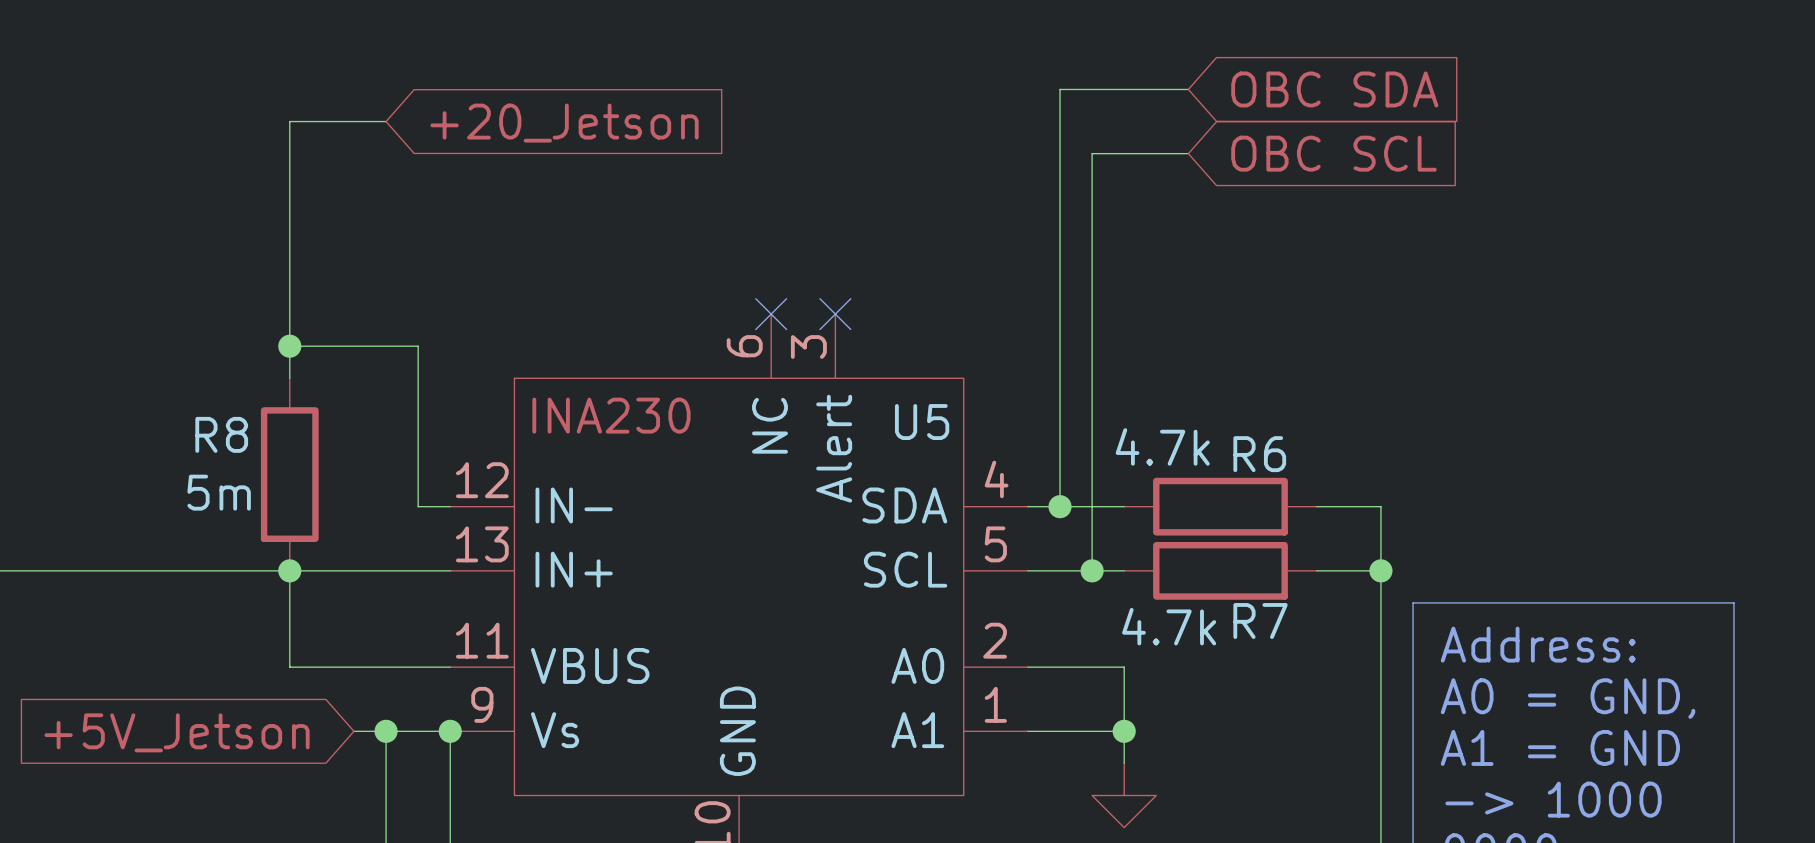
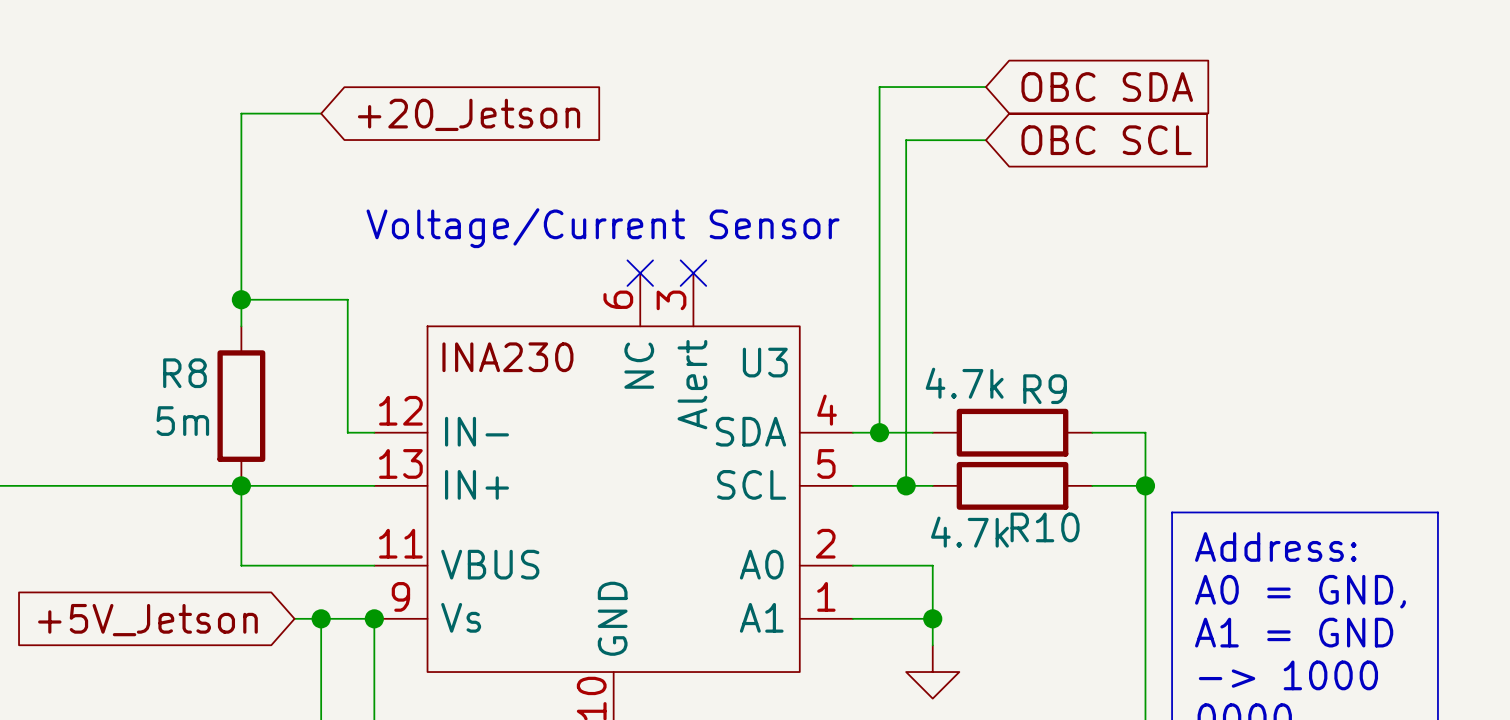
text: none -> Voltage/Current Sensor (603, 228)
U5 name: U5 (922, 422) -> U3 (765, 362)
R6 name: R6 (1259, 454) -> R9 (1045, 389)
R7 name: R7 (1260, 621) -> R10 (1045, 527)

